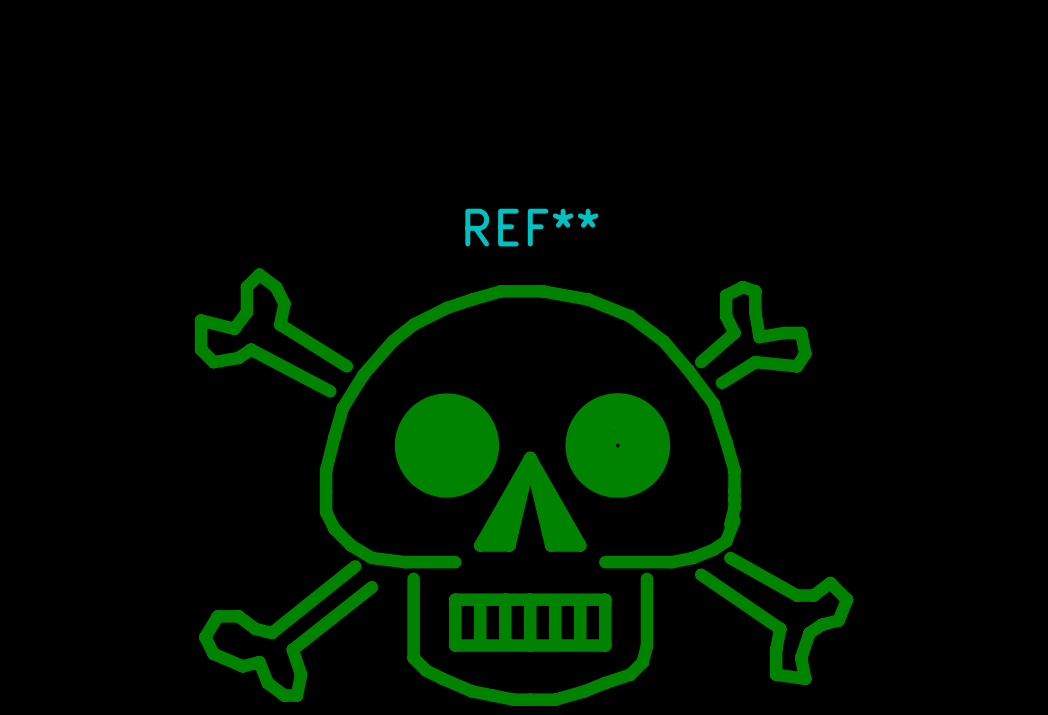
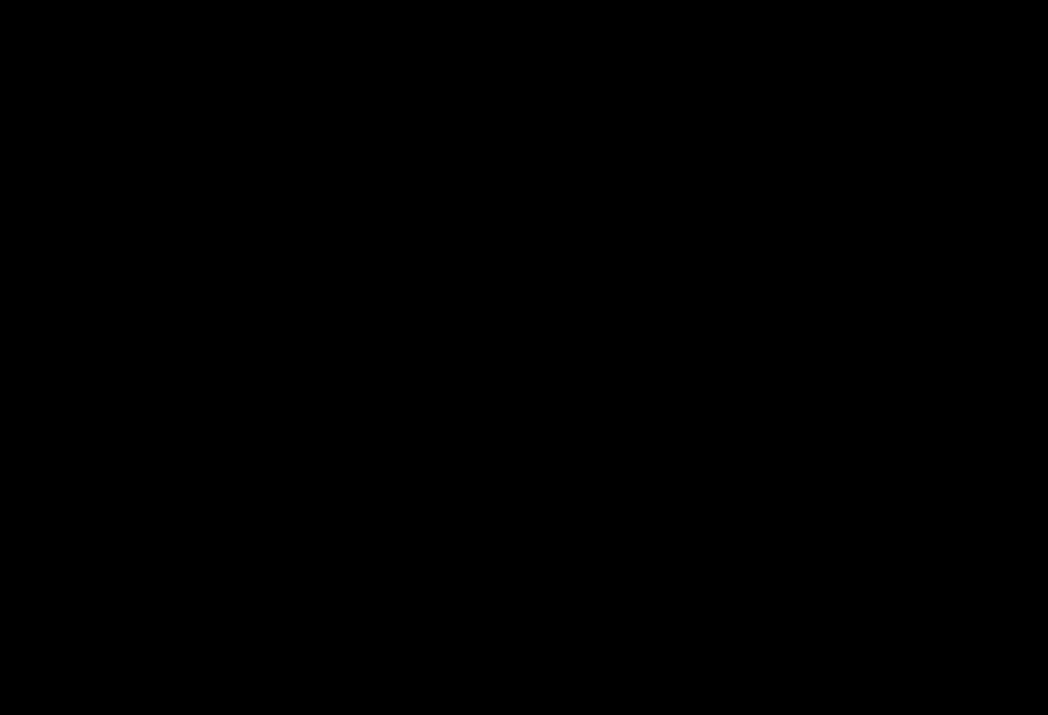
REF**: (524, 487) -> none

